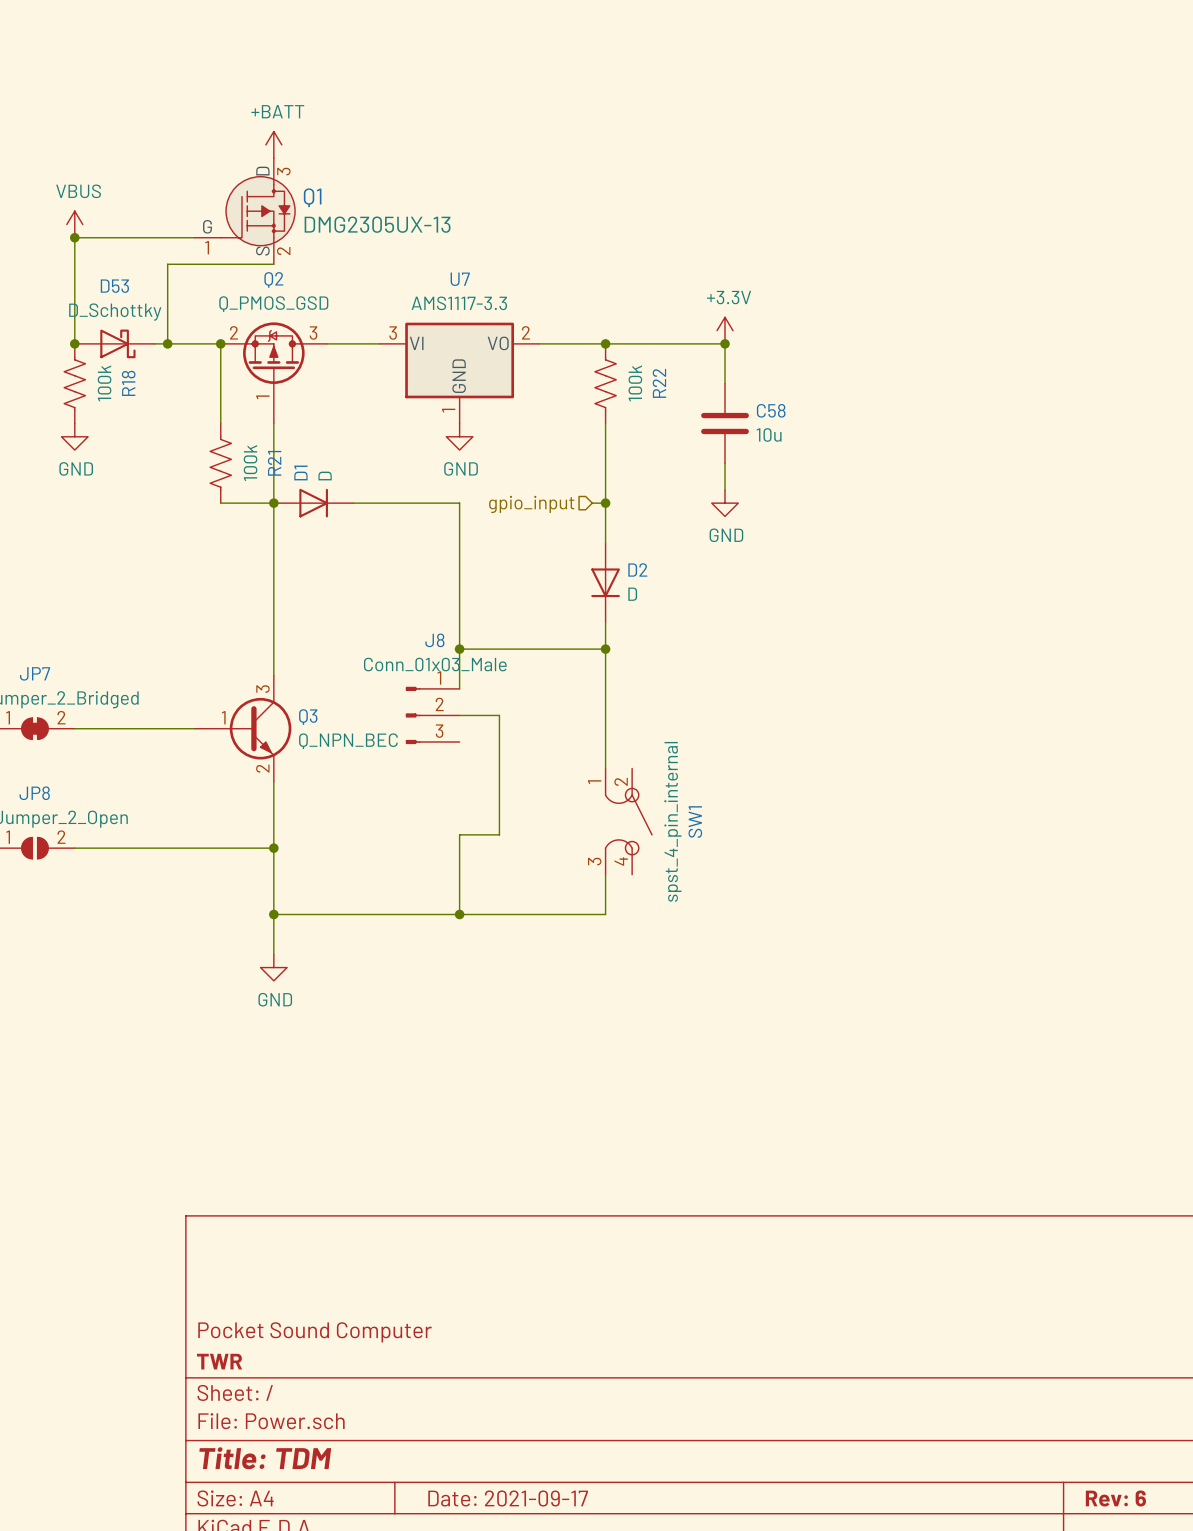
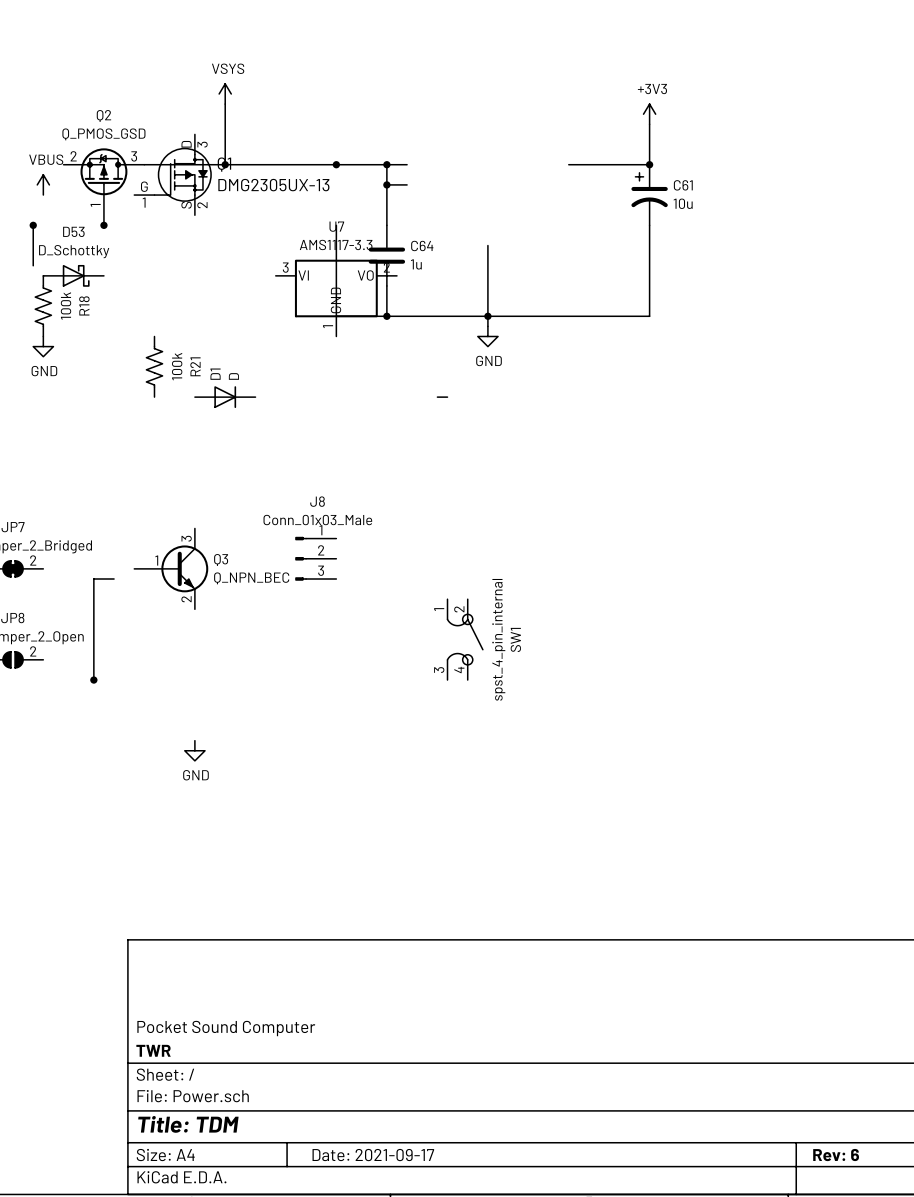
power symbol: none -> VSYS (225, 93)
wire: none -> (225, 104) (225, 164)
power symbol: none -> +3V3 (649, 114)
power symbol: +BATT (273, 144) -> none
wire: none -> (649, 124) (649, 164) (568, 164)
wire: none -> (144, 164) (407, 164)
junction: none -> (225, 164)
junction: none -> (336, 164)
wire: none -> (386, 164) (386, 225)
junction: none -> (386, 164)
junction: none -> (649, 164)
wire: none -> (386, 184) (407, 184)
junction: none -> (386, 184)
junction: (74, 237) -> none
wire: (194, 237) (74, 237) (74, 343) -> none
C61: none -> 10u (649, 195)
wire: (273, 264) (167, 264) (167, 343) -> none
wire: none -> (33, 225) (33, 265)
junction: none -> (33, 225)
junction: none -> (103, 225)
wire: none -> (336, 225) (336, 316) (649, 316) (649, 225)
wire: none -> (487, 245) (487, 326)
C64: none -> 1u (386, 255)
power symbol: +3.3V (725, 330) -> none
junction: (74, 343) -> none
wire: (154, 343) (220, 343) (220, 423) -> none
junction: (167, 343) -> none
junction: (220, 343) -> none
wire: (326, 343) (379, 343) -> none
wire: (539, 343) (725, 343) (725, 383) -> none
junction: (605, 343) -> none
junction: (725, 343) -> none
wire: none -> (386, 285) (386, 316)
Q2 position: (273, 372) -> (103, 186)
R22: 100k (605, 383) -> none
junction: none -> (386, 316)
junction: none -> (487, 316)
wire: (273, 423) (273, 675) -> none
wire: (605, 423) (605, 542) -> none
power symbol: none -> GND (487, 336)
C58: 10u (725, 423) -> none
power symbol: GND (459, 436) -> none
wire: (725, 463) (725, 489) -> none
wire: (220, 503) (273, 503) -> none
junction: (273, 503) -> none
wire: (353, 503) (459, 503) (459, 688) -> none
junction: (605, 503) -> none
power symbol: GND (725, 503) -> none
hierarchical label: gpio_input (531, 504) -> none
D2: D (605, 582) -> none
wire: (605, 622) (605, 768) -> none
wire: (459, 649) (605, 649) -> none
junction: (459, 649) -> none
junction: (605, 649) -> none
wire: (459, 715) (499, 715) (499, 834) (459, 834) (459, 914) -> none
wire: (74, 728) (194, 728) -> none
wire: none -> (114, 578) (93, 578) (93, 680)
wire: (273, 781) (273, 954) -> none
wire: (74, 848) (273, 848) -> none
junction: (273, 848) -> none
junction: none -> (93, 680)
wire: (605, 874) (605, 914) (273, 914) -> none
junction: (273, 914) -> none
junction: (459, 914) -> none

